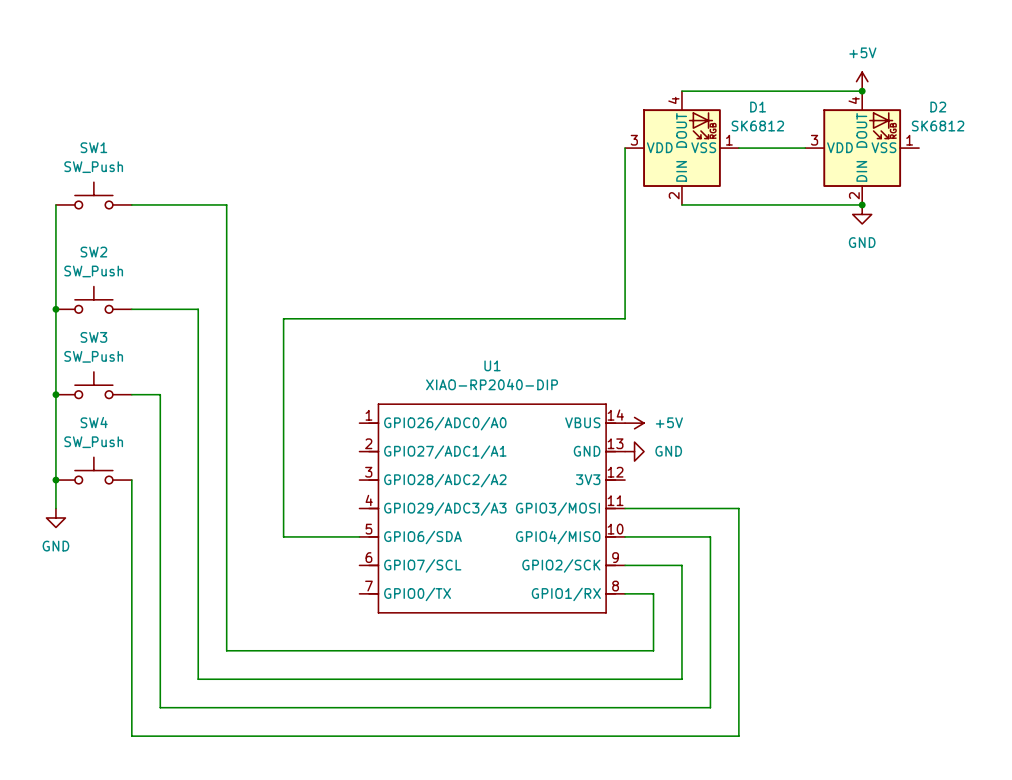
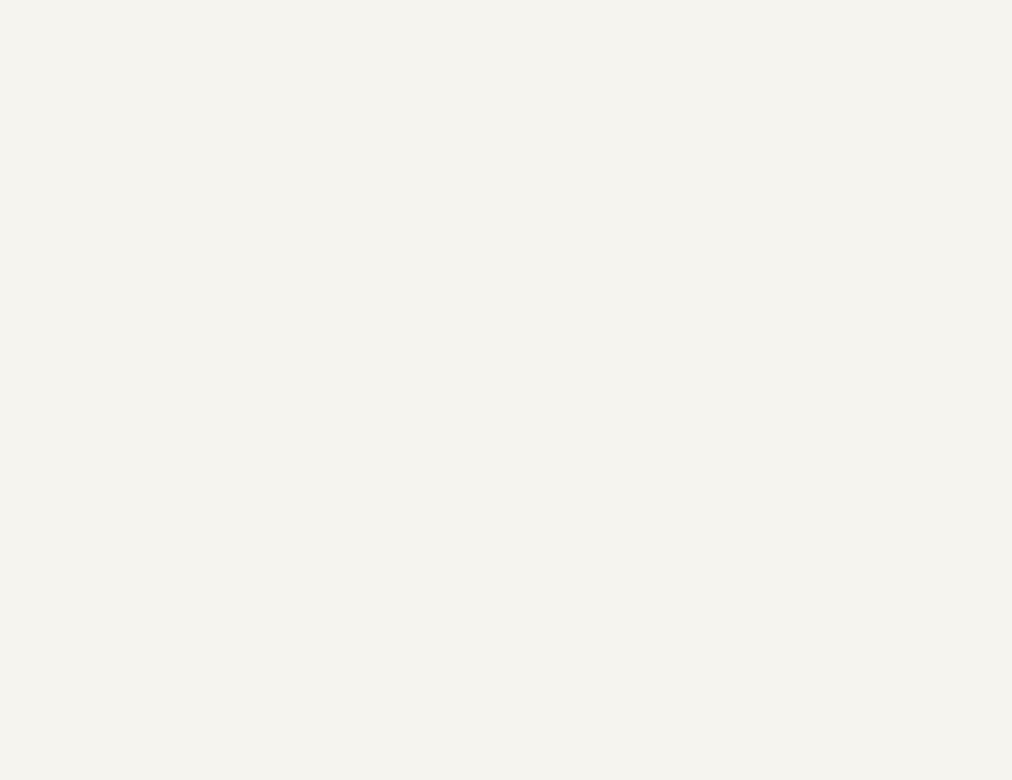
power symbol: +5V (862, 81) -> none
wire: (681, 91) (862, 91) -> none
junction: (862, 91) -> none
wire: (625, 148) (625, 318) (283, 318) (283, 536) (359, 536) -> none
D1: SK6812 (681, 148) -> none
wire: (738, 148) (805, 148) -> none
D2: SK6812 (862, 148) -> none
SW1: SW_Push (93, 195) -> none
wire: (55, 204) (55, 508) -> none
wire: (131, 204) (226, 204) (226, 650) (653, 650) (653, 593) (625, 593) -> none
wire: (681, 204) (862, 204) -> none
junction: (862, 204) -> none
power symbol: GND (862, 214) -> none
SW2: SW_Push (93, 299) -> none
junction: (55, 309) -> none
wire: (131, 309) (198, 309) (198, 679) (681, 679) (681, 565) (625, 565) -> none
SW3: SW_Push (93, 385) -> none
junction: (55, 394) -> none
wire: (131, 394) (160, 394) (160, 707) (710, 707) (710, 536) (625, 536) -> none
power symbol: +5V (634, 423) -> none
power symbol: GND (634, 451) -> none
SW4: SW_Push (93, 470) -> none
junction: (55, 480) -> none
wire: (131, 480) (131, 736) (738, 736) (738, 508) (625, 508) -> none
U1: XIAO-RP2040-DIP (492, 508) -> none
power symbol: GND (55, 517) -> none

